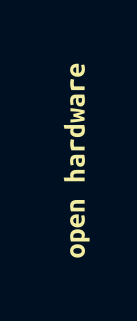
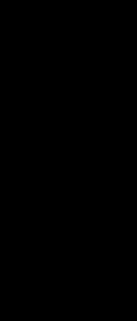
drawing: [63, 63, 90, 258] -> none

